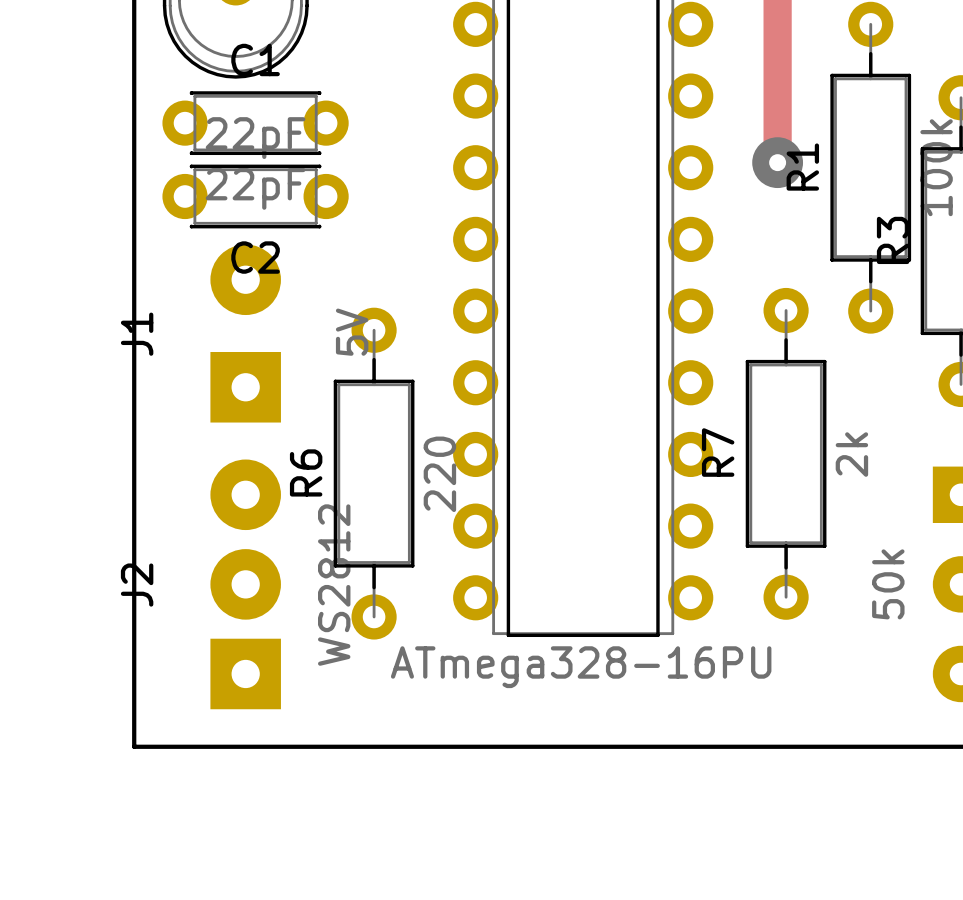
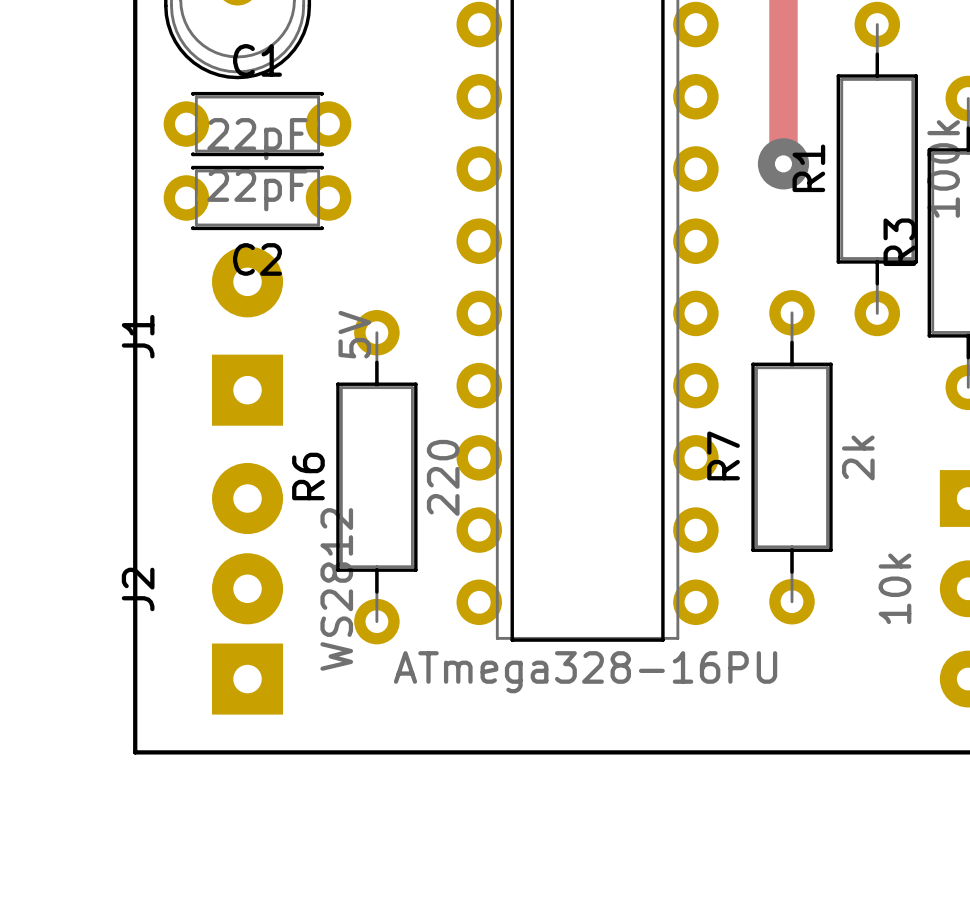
part value: 50k (888, 584) -> 10k (894, 588)

